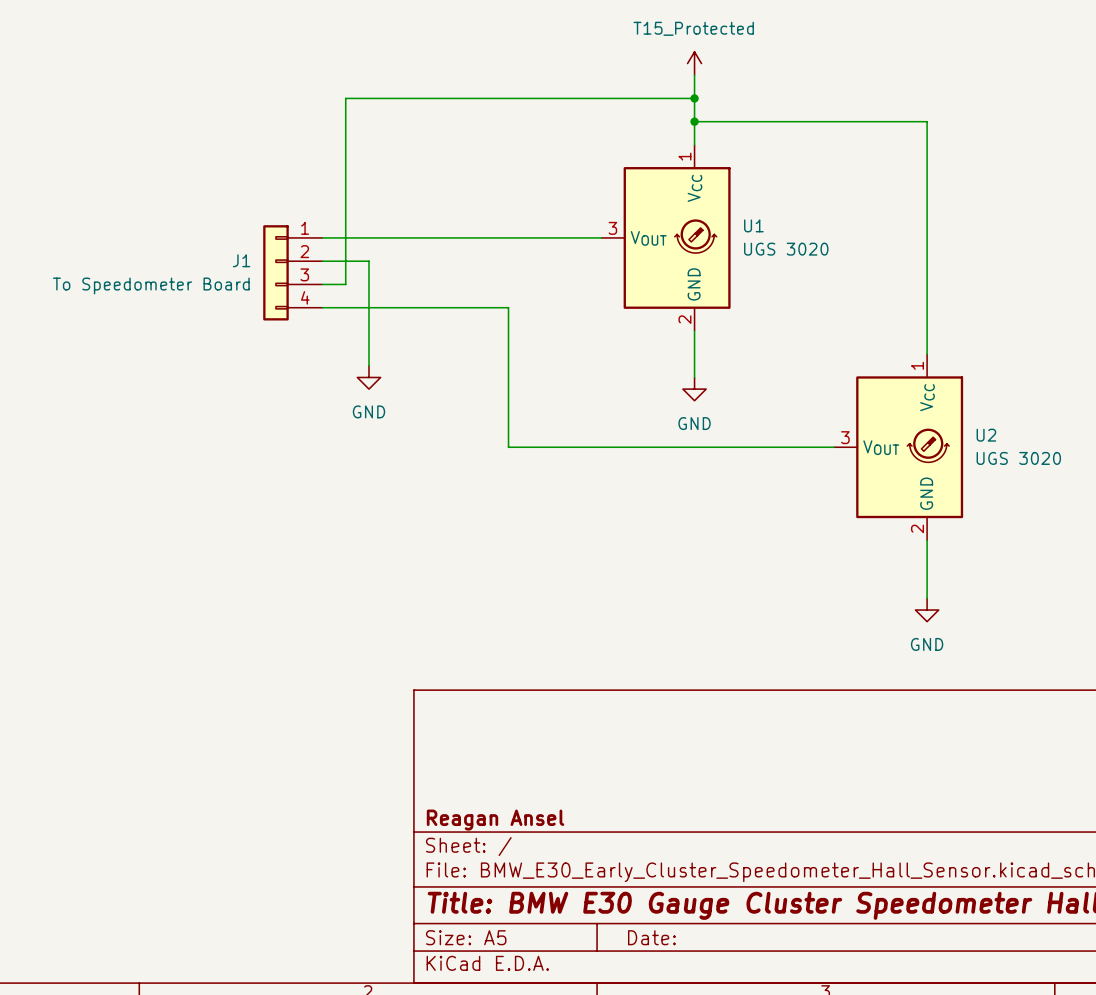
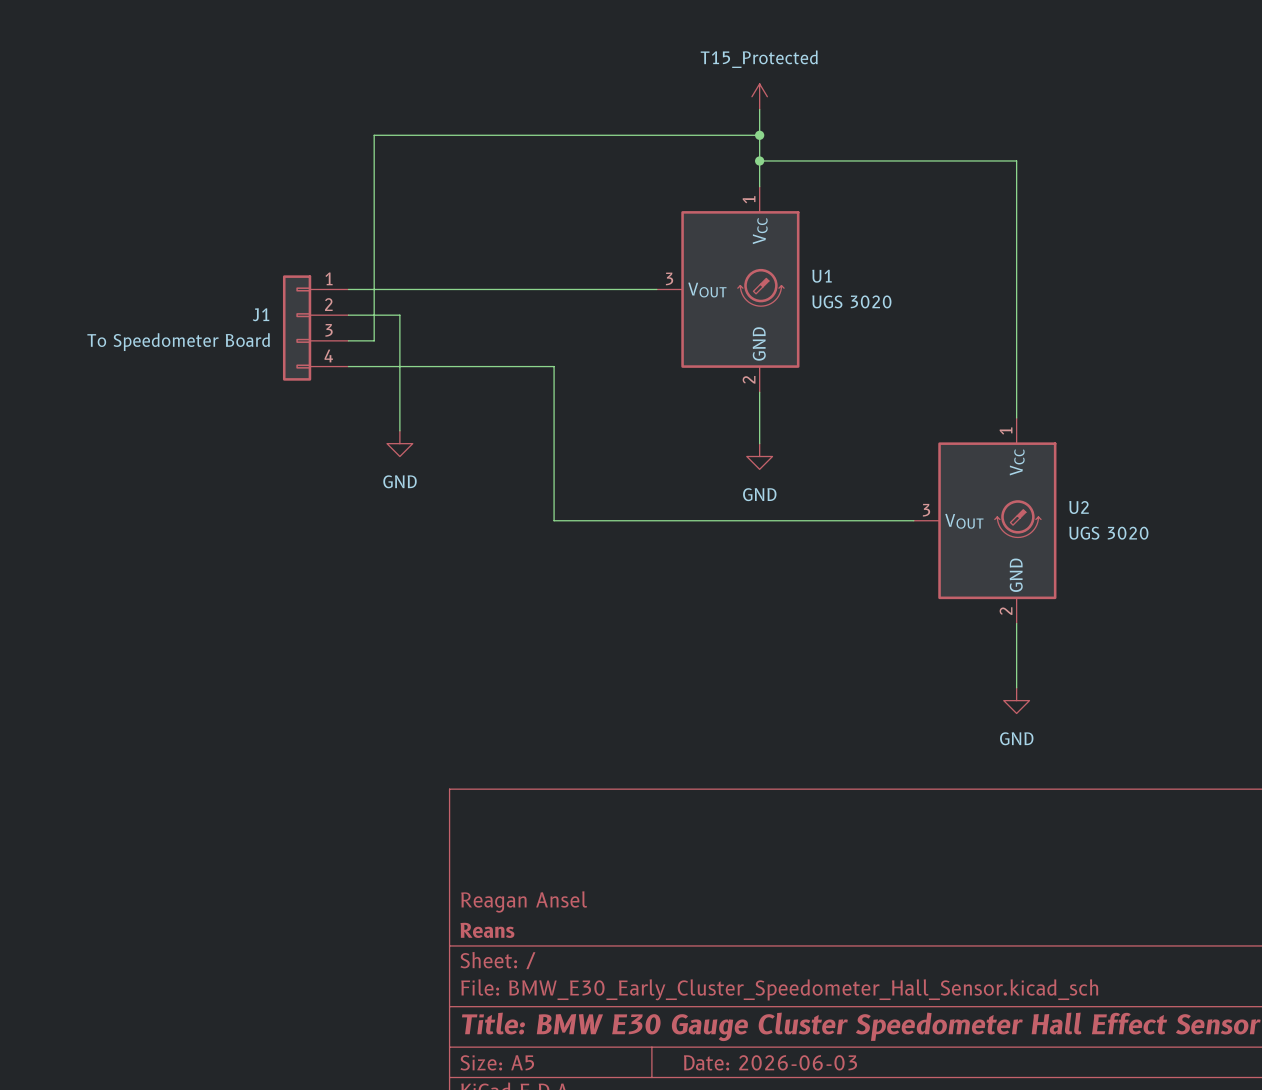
title block: none -> Reagan Ansel (524, 901)
title block: Reagan Ansel (495, 820) -> Reans (487, 930)
title block: Date: (651, 937) -> Date: 2026-06-03 (770, 1062)

